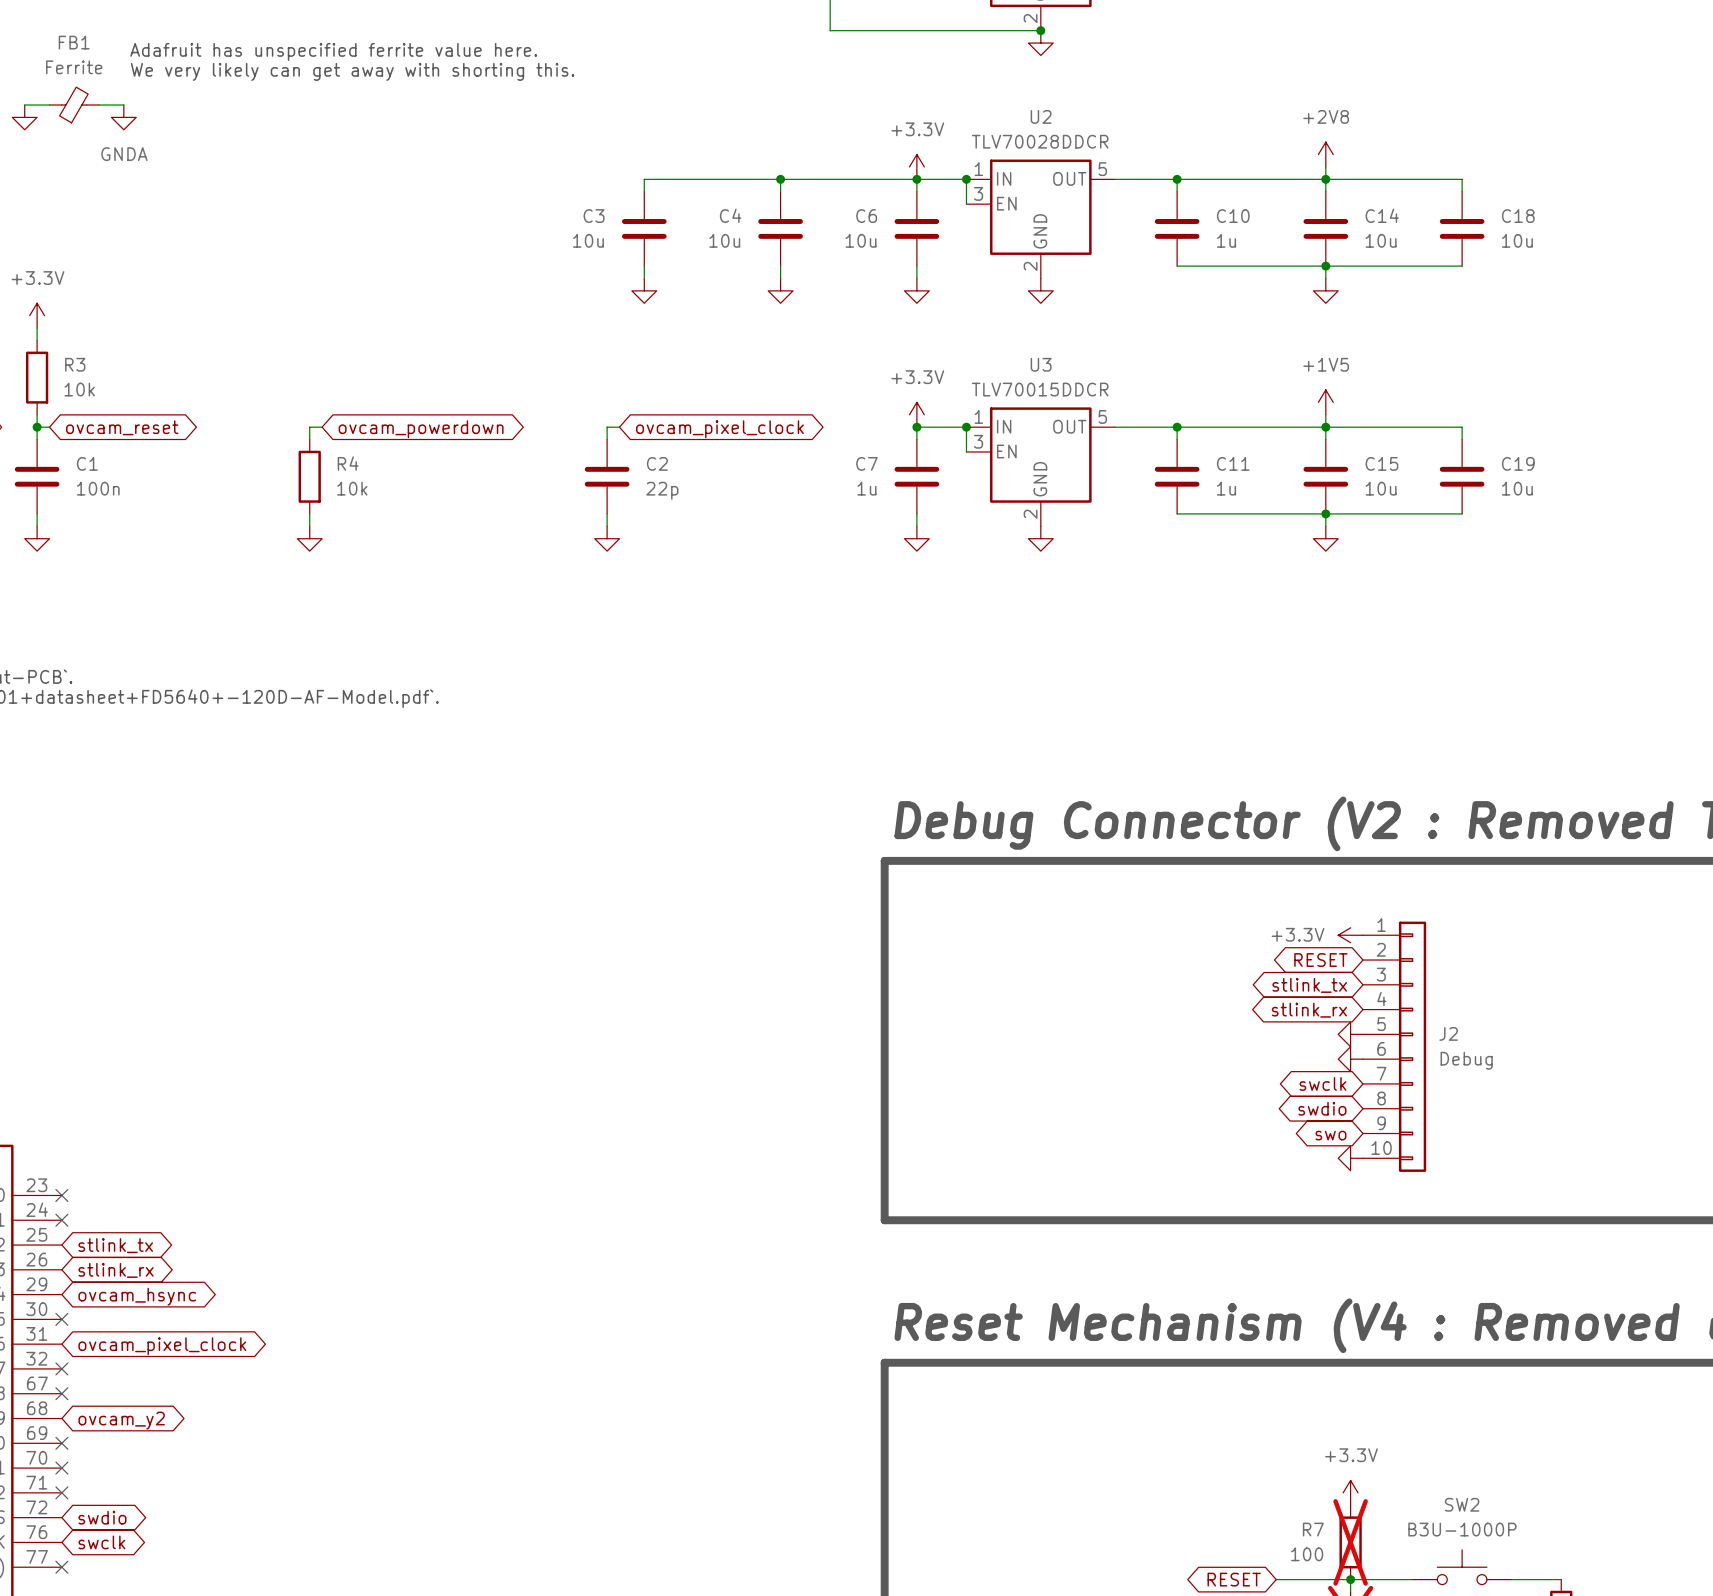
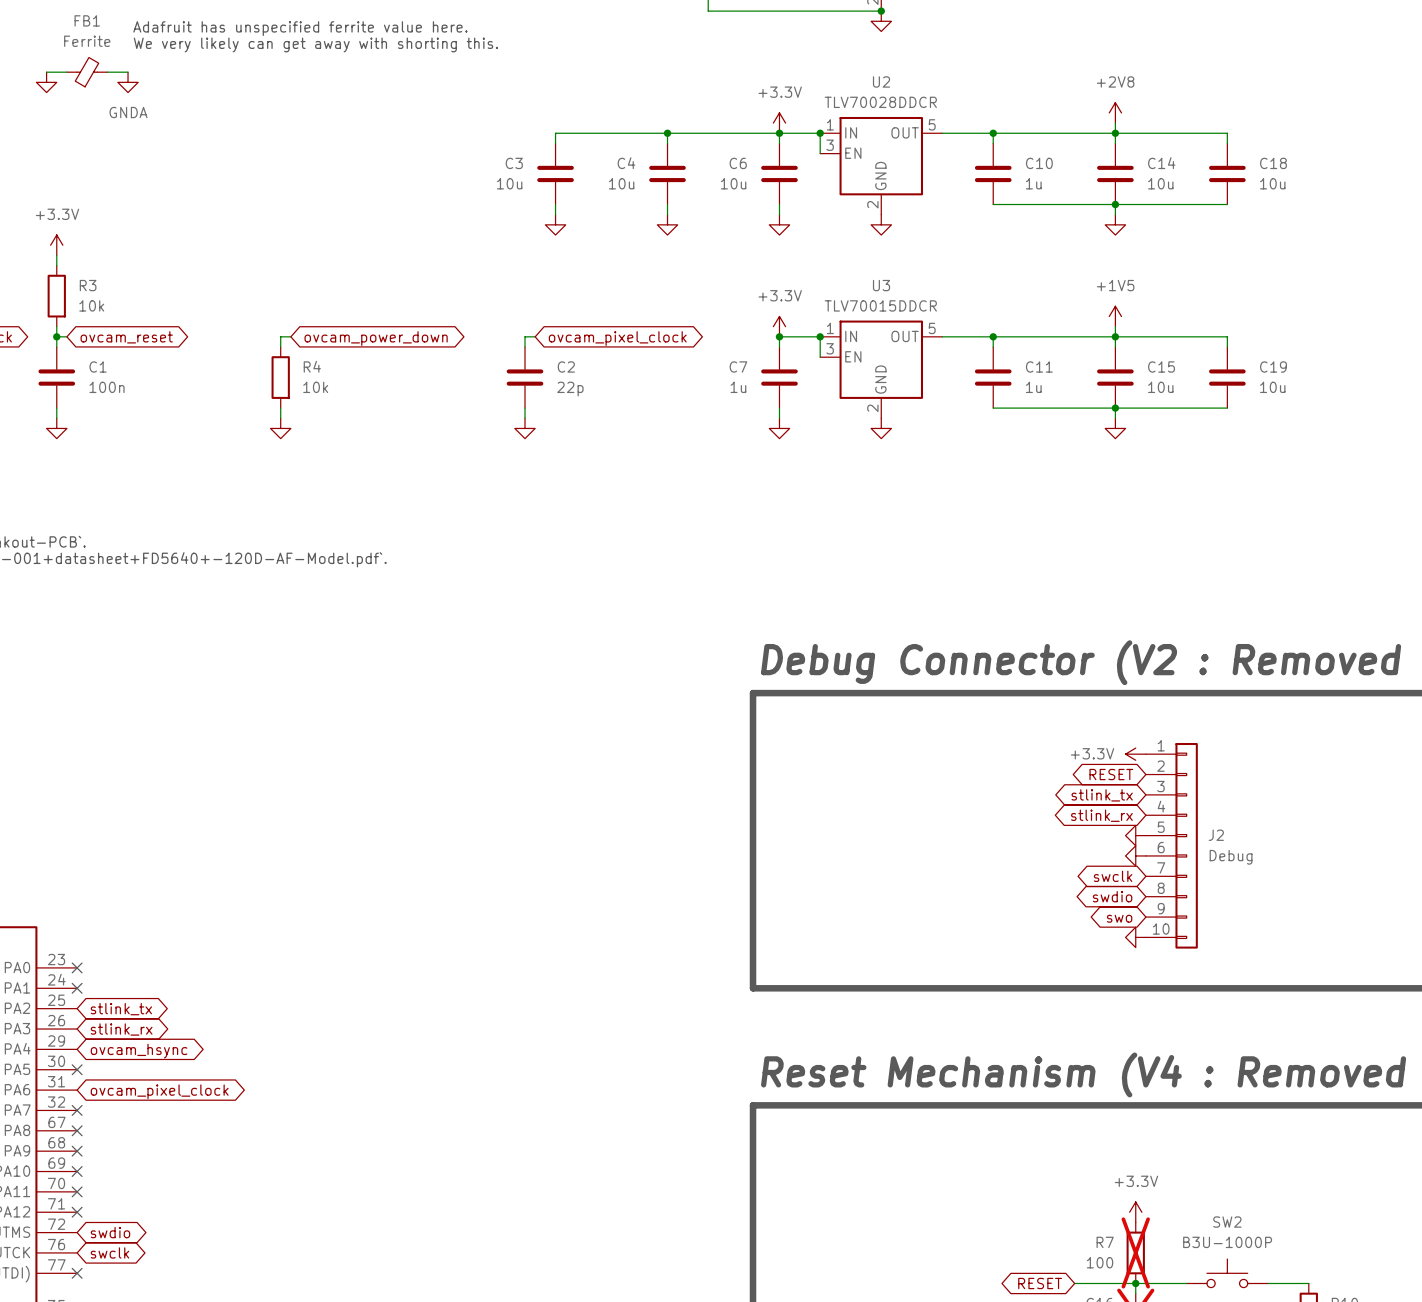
global label: ovcam_powerdown (421, 429) -> ovcam_power_down (376, 338)
no-connect mark: none -> (77, 1151)
global label: ovcam_y2 (121, 1420) -> none

